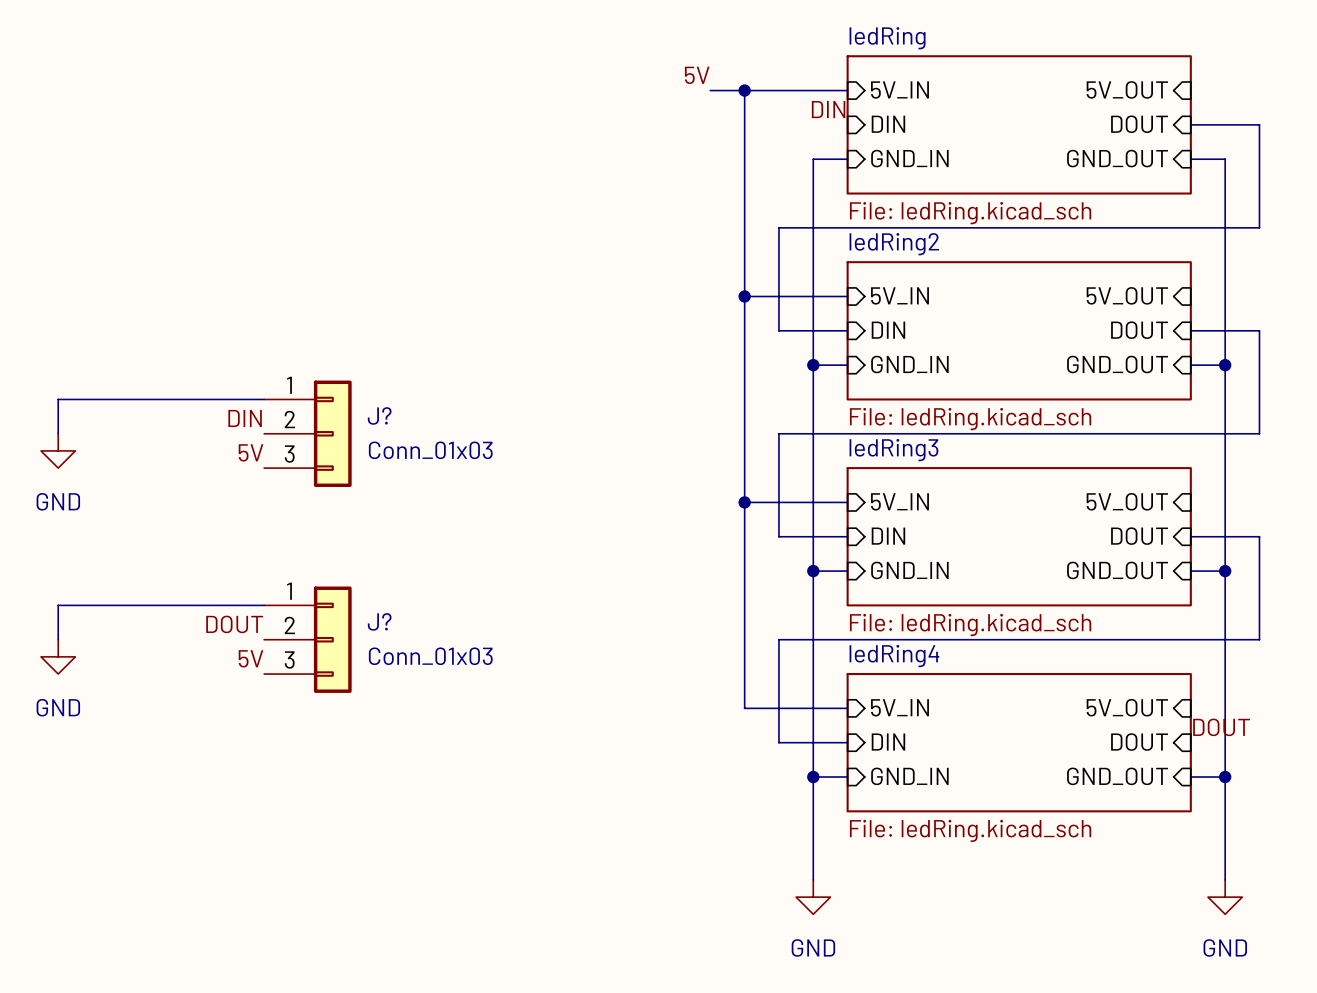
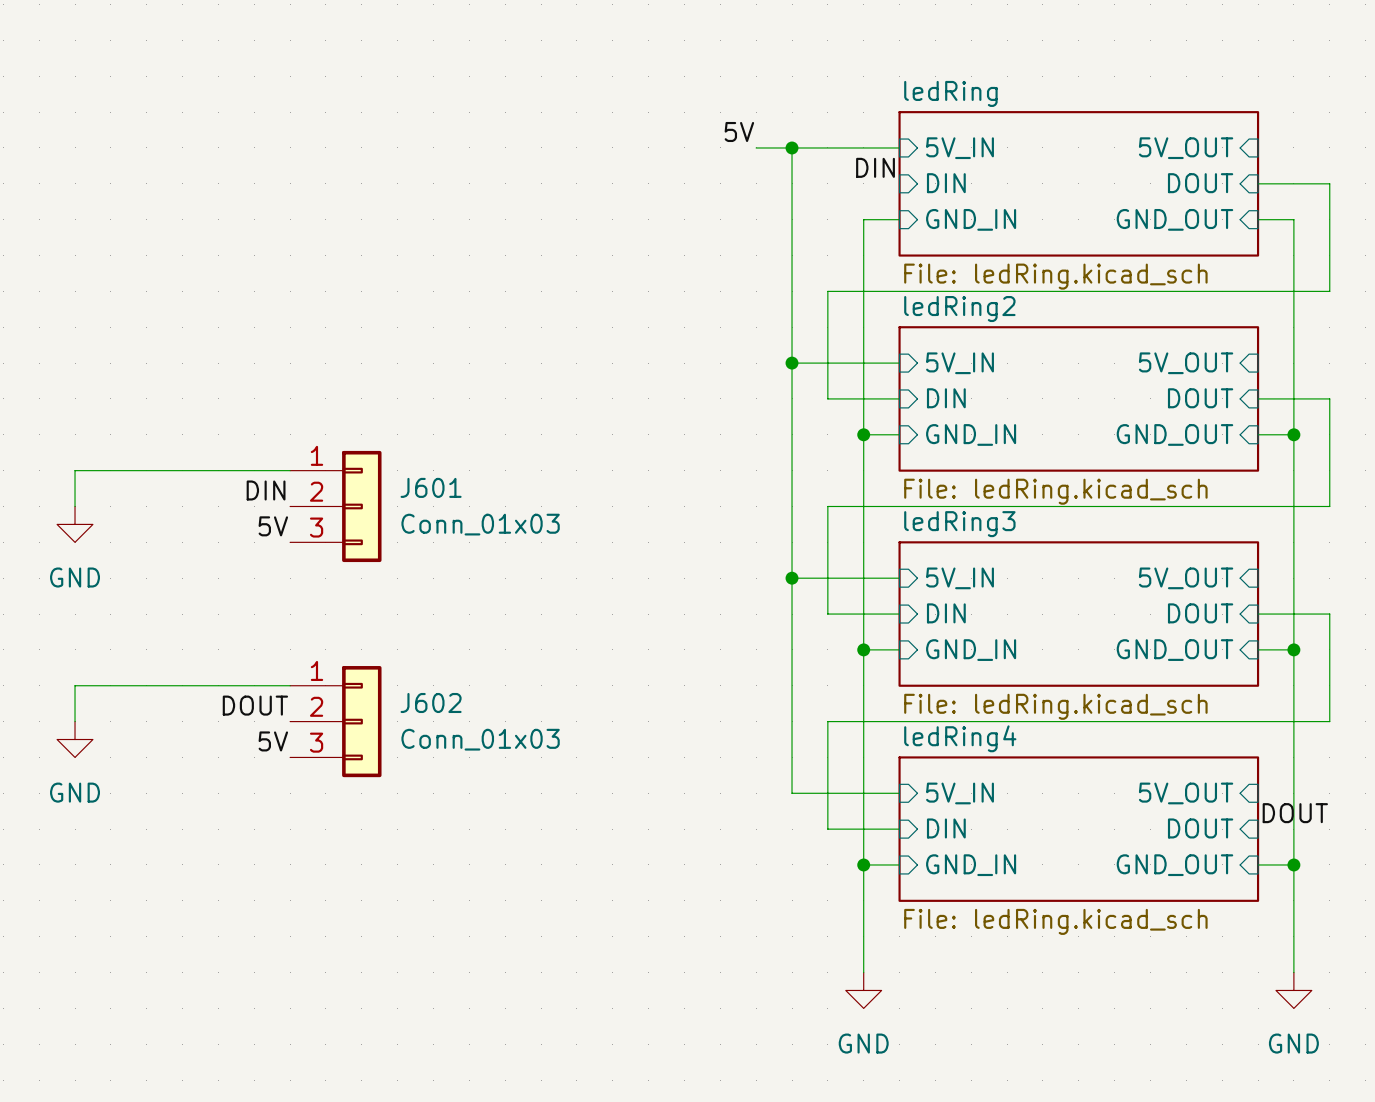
J? name: J? (379, 415) -> J601 (431, 487)
J? name: J? (379, 621) -> J602 (431, 702)

